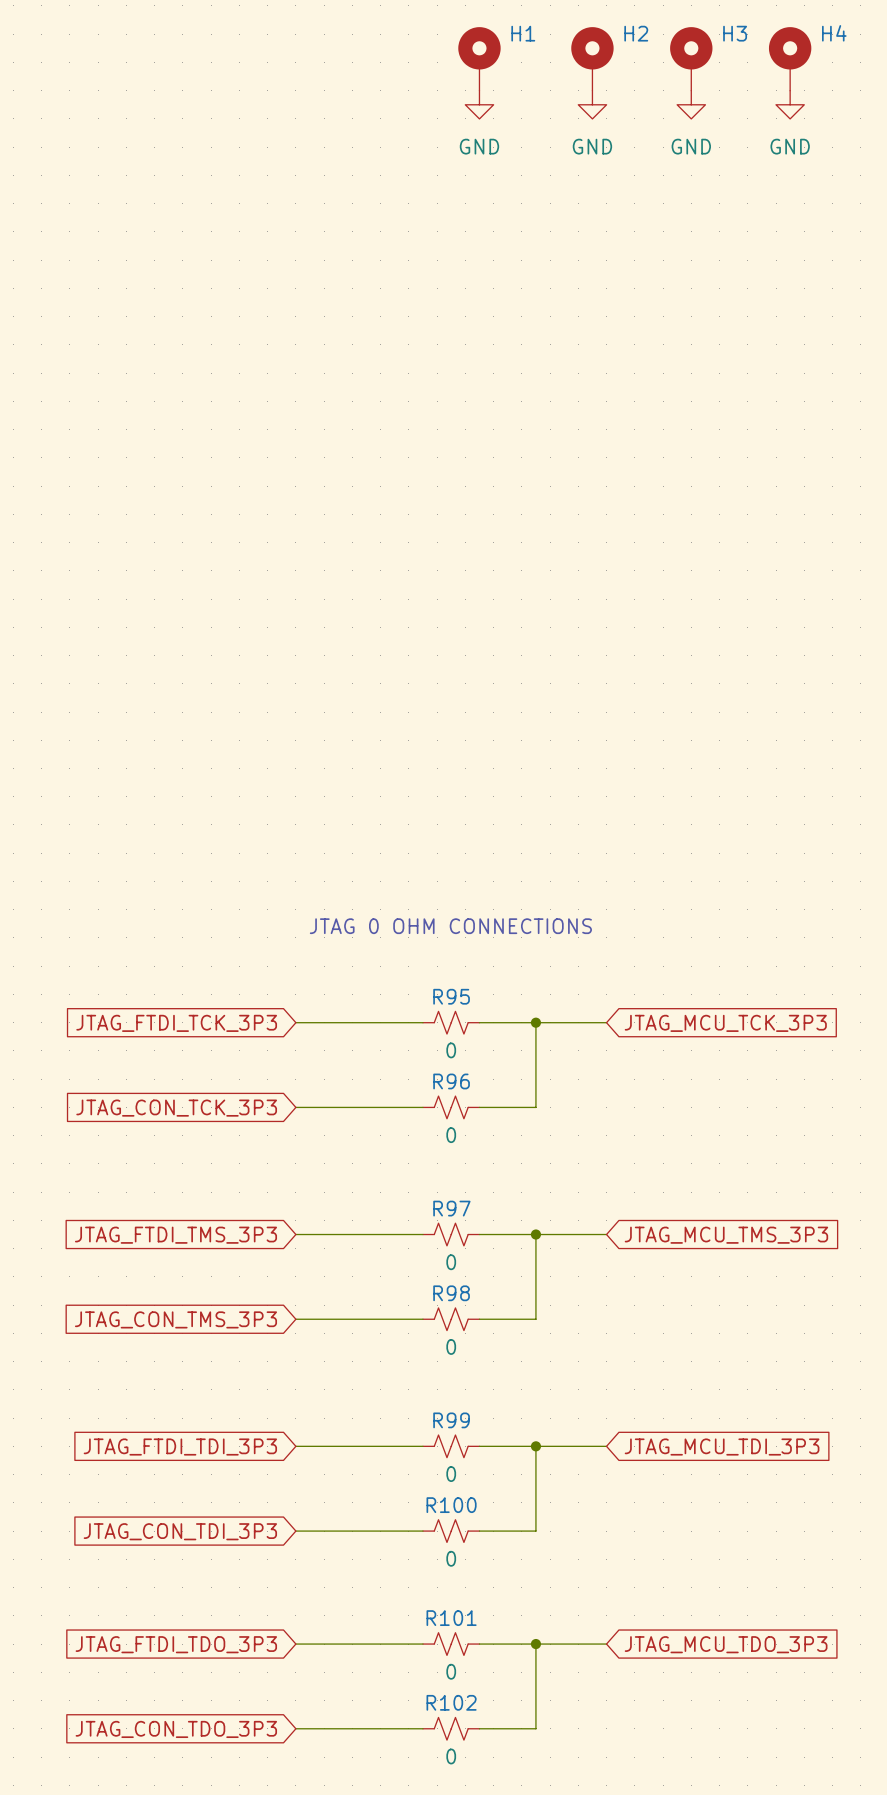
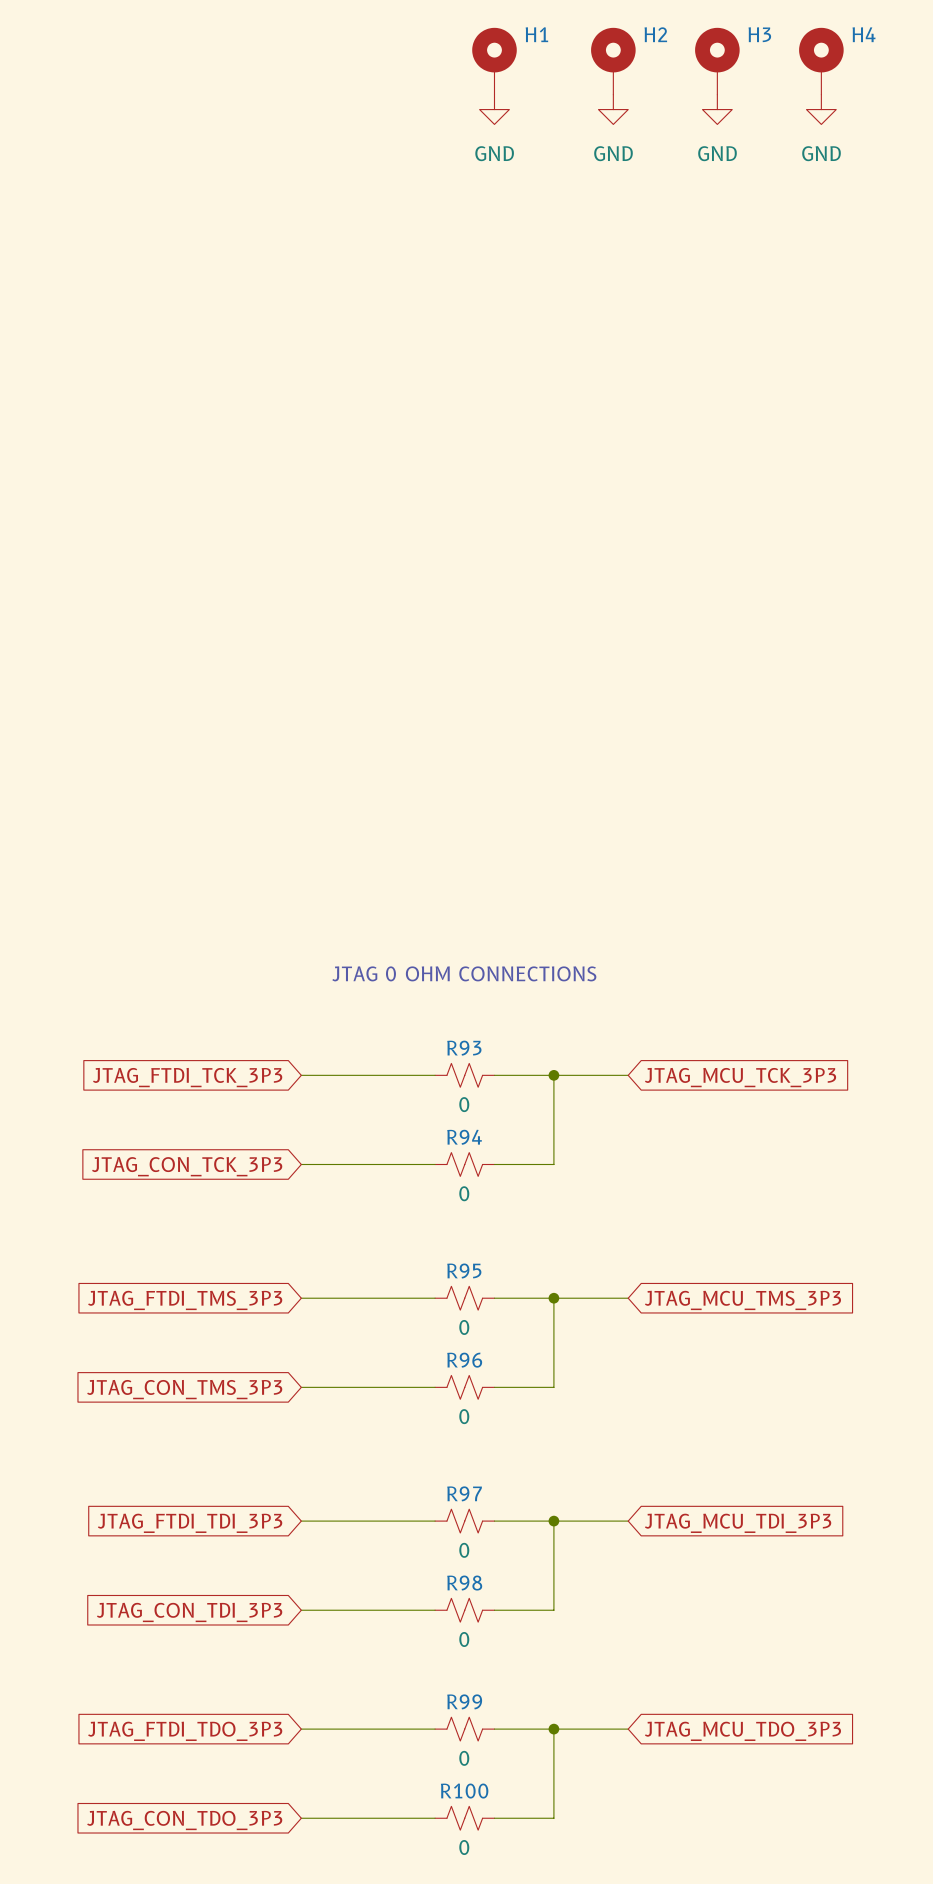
R95 name: R95 (451, 996) -> R93 (464, 1048)
R96 name: R96 (451, 1081) -> R94 (464, 1137)
R97 name: R97 (451, 1208) -> R95 (464, 1271)
R98 name: R98 (451, 1293) -> R96 (464, 1360)
R99 name: R99 (451, 1420) -> R97 (464, 1493)
R100 name: R100 (451, 1505) -> R98 (464, 1583)
R101 name: R101 (451, 1618) -> R99 (464, 1701)
R102 name: R102 (451, 1702) -> R100 (464, 1791)

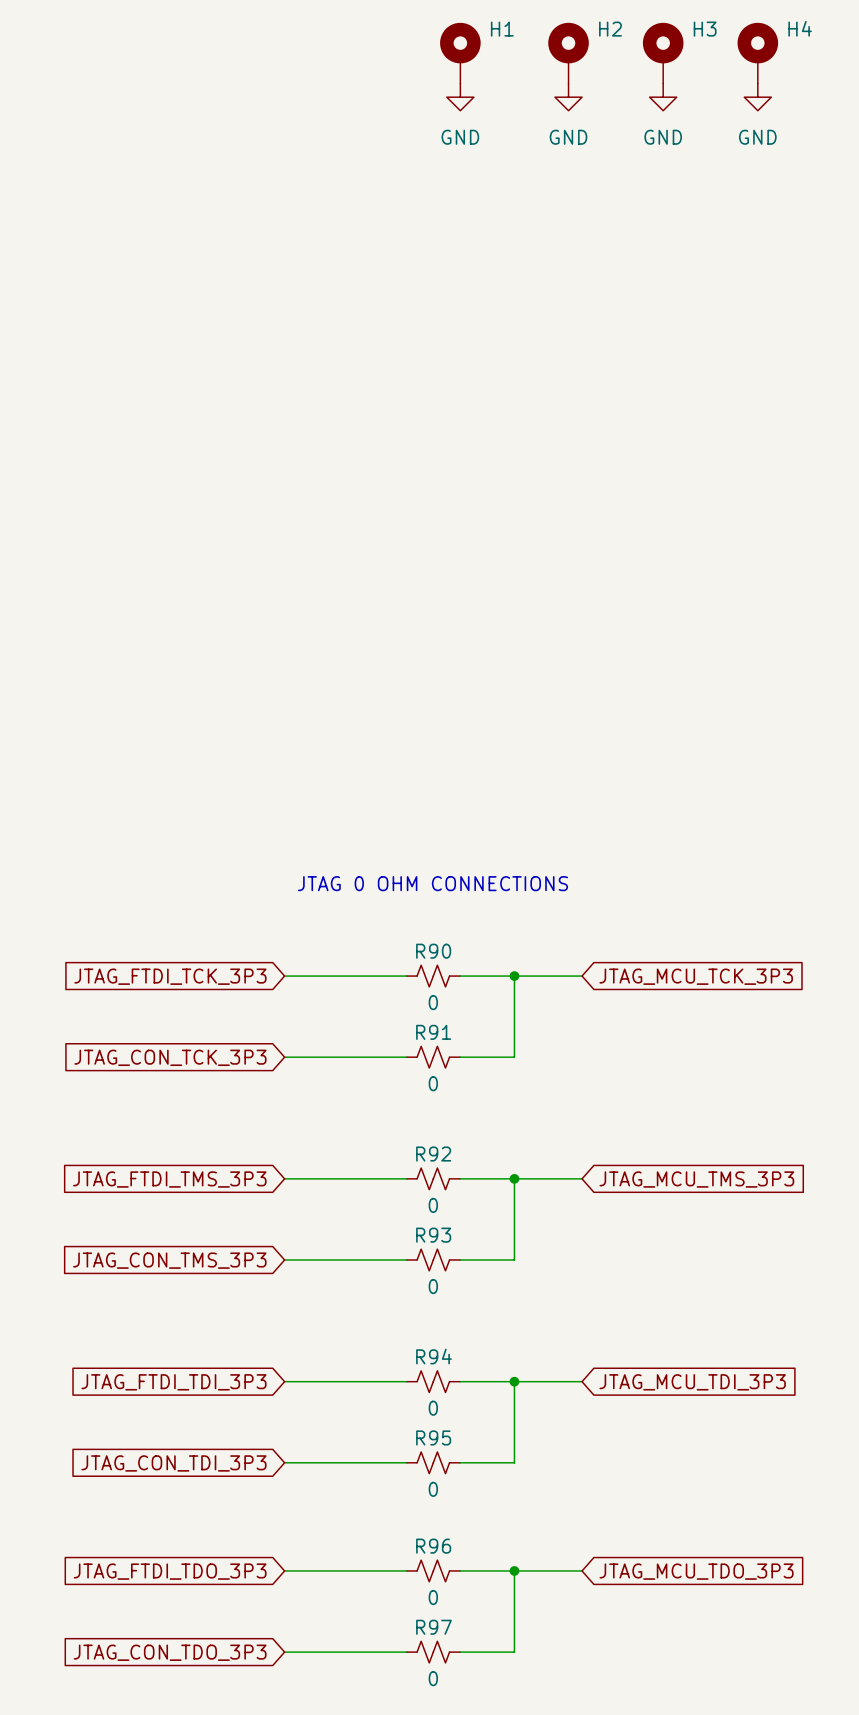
R93 name: R93 (464, 1048) -> R90 (433, 951)
R94 name: R94 (464, 1137) -> R91 (433, 1032)
R95 name: R95 (464, 1271) -> R92 (433, 1154)
R96 name: R96 (464, 1360) -> R93 (433, 1235)
R97 name: R97 (464, 1493) -> R94 (433, 1356)
R98 name: R98 (464, 1583) -> R95 (433, 1437)
R99 name: R99 (464, 1701) -> R96 (433, 1546)
R100 name: R100 (464, 1791) -> R97 (433, 1627)

